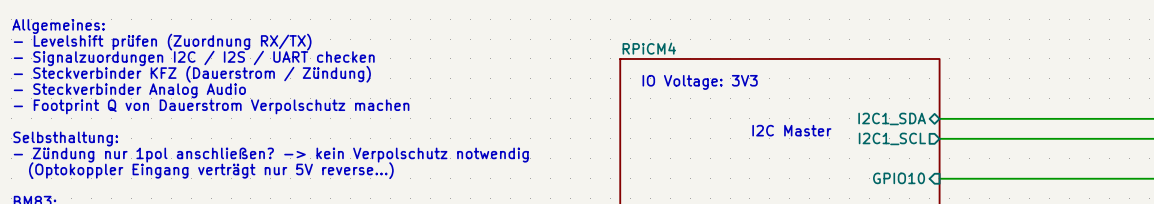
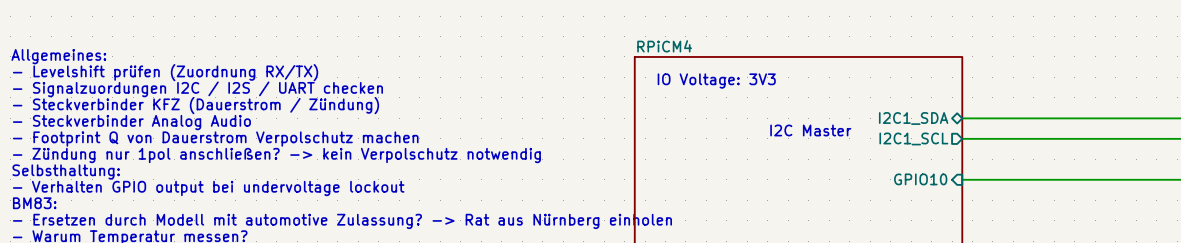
text: Allgemeines: (58, 26) -> none
text: - Levelshift prüfen (Zuordnung RX/TX) (162, 42) -> none
text: - Signalzuordungen I2C / I2S / UART checken (194, 58) -> Allgemeines: (58, 56)
text: - Steckverbinder KFZ (Dauerstrom / Zündung) (192, 74) -> - Levelshift prüfen (Zuordnung RX/TX) (165, 72)
text: - Steckverbinder Analog Audio (129, 90) -> - Signalzuordungen I2C / I2S / UART checken (197, 89)
text: - Footprint Q von Dauerstrom Verpolschutz machen (211, 106) -> - Steckverbinder KFZ (Dauerstrom / Zündung) (196, 105)
text: none -> - Steckverbinder Analog Audio (131, 122)
text: Selbsthaltung: (65, 139) -> - Footprint Q von Dauerstrom Verpolschutz machen (215, 139)
text: (Optokoppler Eingang verträgt nur 5V reverse...) (211, 170) -> Selbsthaltung: (66, 171)
text: none -> - Verhalten GPIO output bei undervoltage lockout (208, 188)

